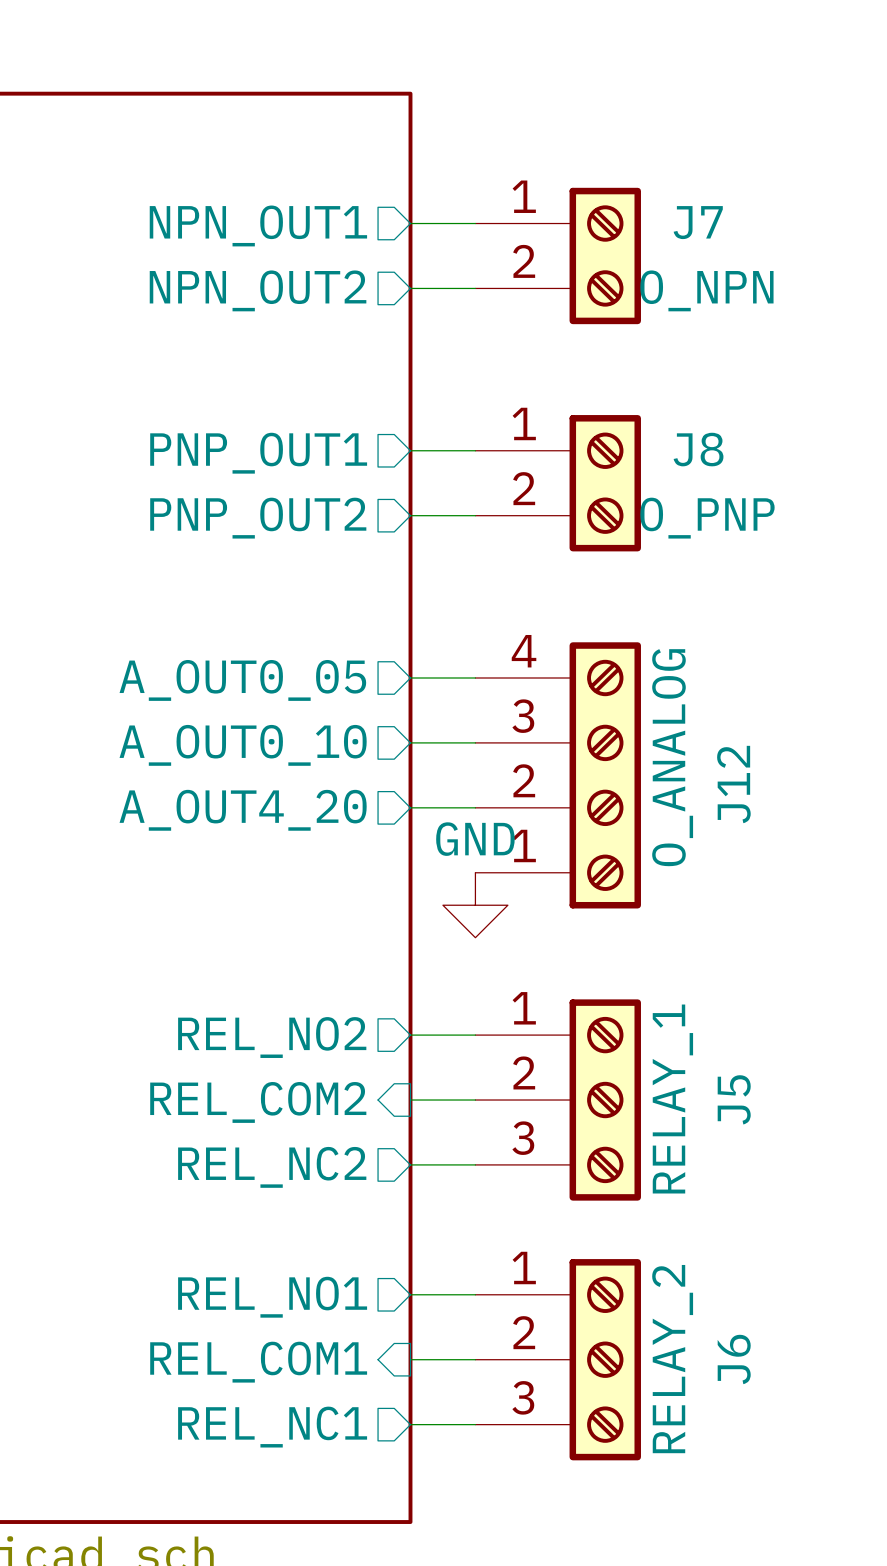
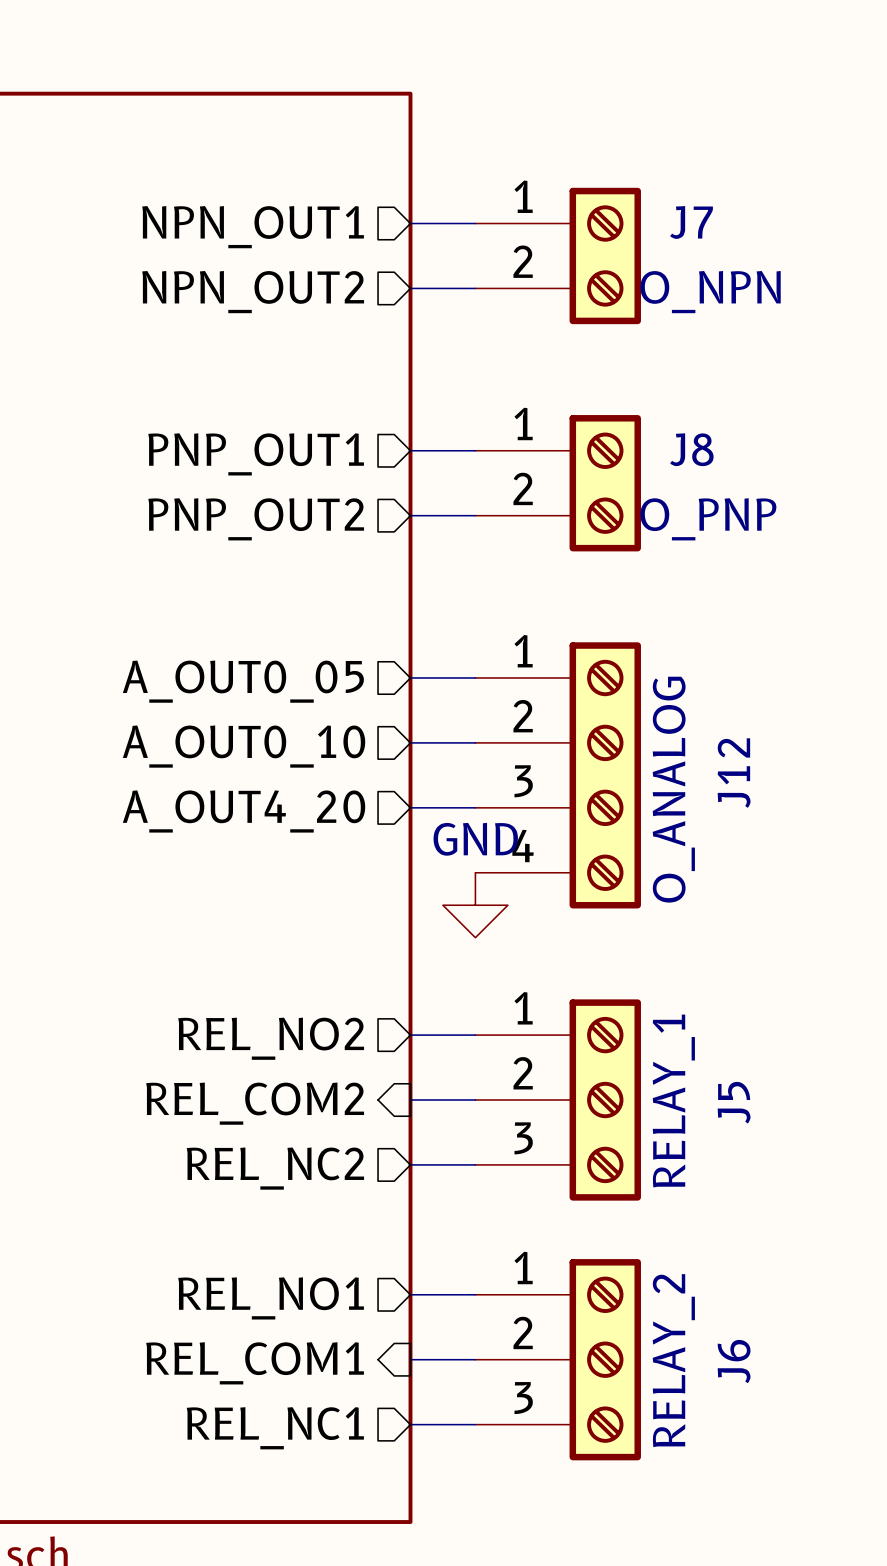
J12 flip: as is (605, 775) -> up-down (605, 775)

